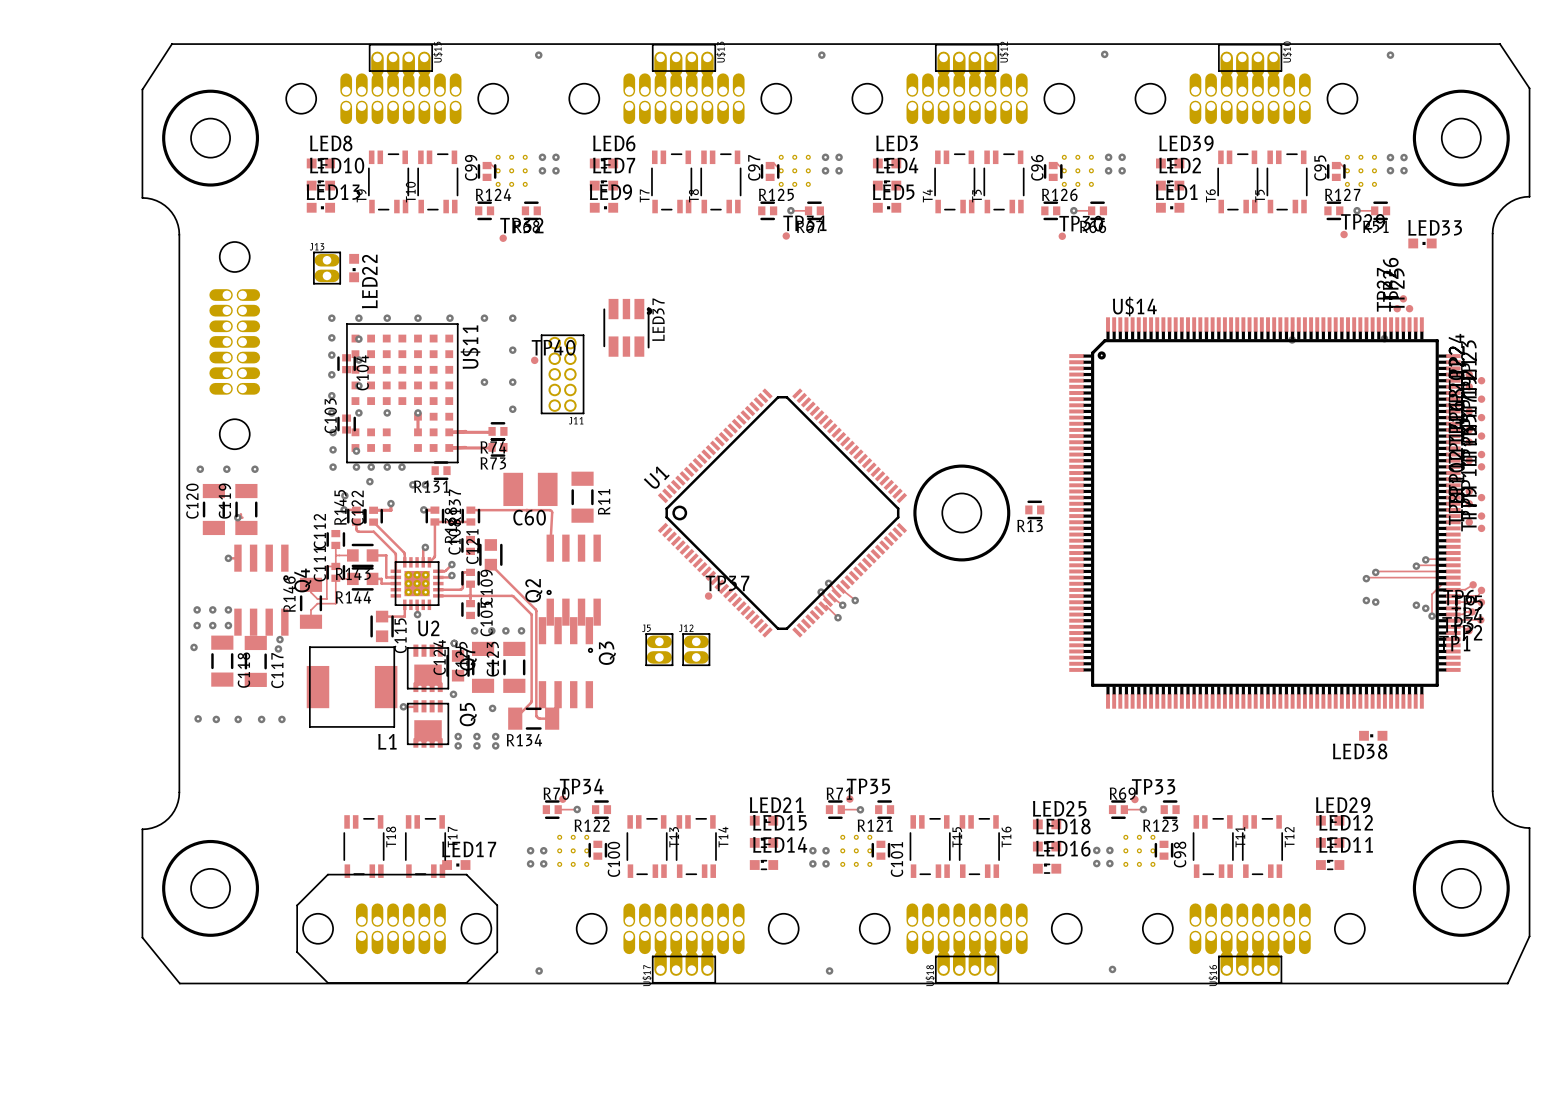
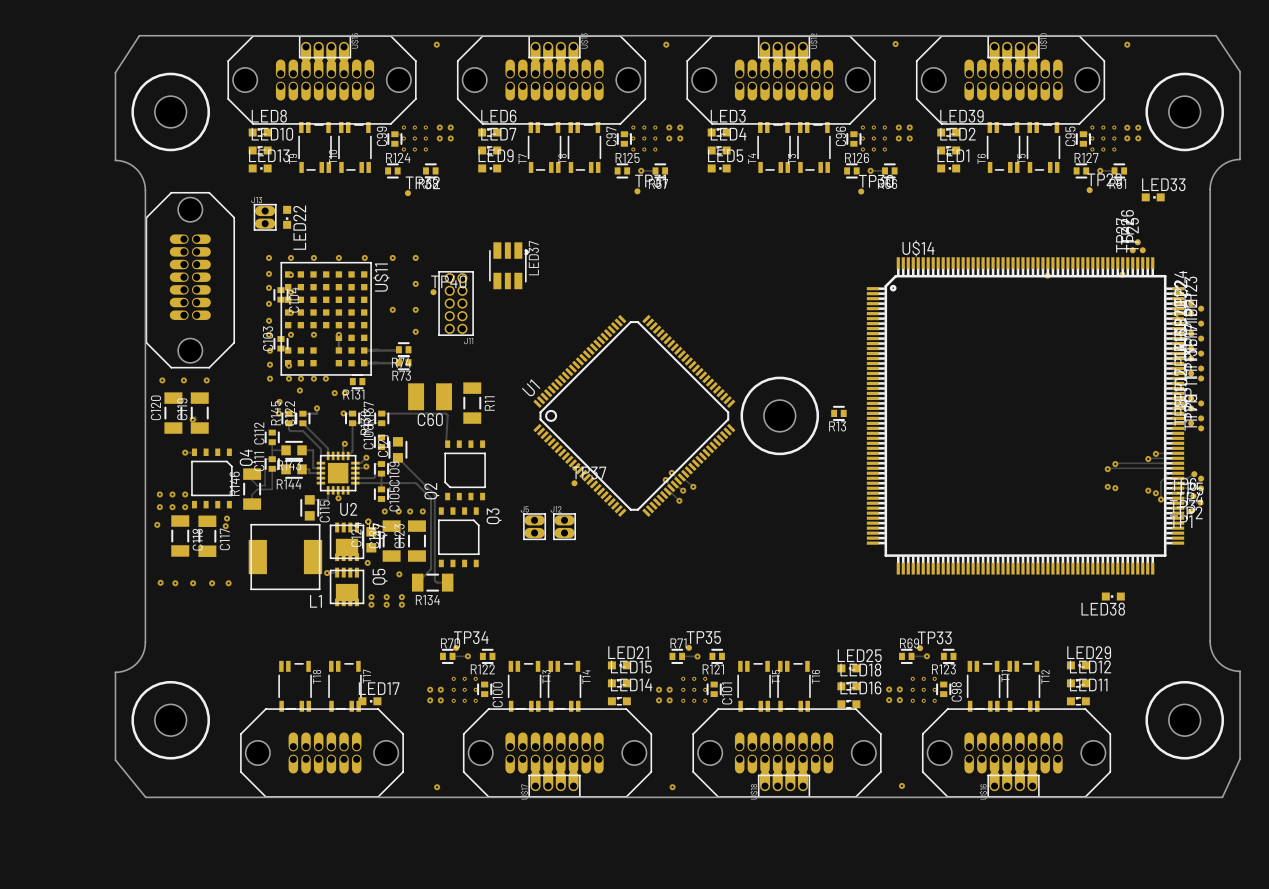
part footprint: [286, 73, 509, 125] -> [227, 35, 417, 125]
part footprint: [569, 73, 792, 125] -> [457, 35, 646, 125]
part footprint: [852, 73, 1075, 125] -> [686, 35, 876, 125]
part footprint: [1135, 73, 1358, 125] -> [916, 35, 1105, 125]
part footprint: [209, 241, 261, 450] -> [145, 192, 235, 369]
Q2 footprint: [546, 534, 601, 626] -> [444, 440, 486, 501]
Q4 footprint: [234, 544, 289, 636] -> [191, 448, 233, 509]
U2 footprint: [390, 557, 444, 611] -> [316, 451, 360, 495]
Q3 footprint: [538, 617, 594, 709] -> [438, 507, 480, 568]
part footprint: [576, 903, 799, 955] -> [463, 708, 652, 798]
part footprint: [859, 903, 1082, 955] -> [692, 708, 882, 798]
part footprint: [1142, 903, 1365, 955] -> [922, 708, 1111, 798]

